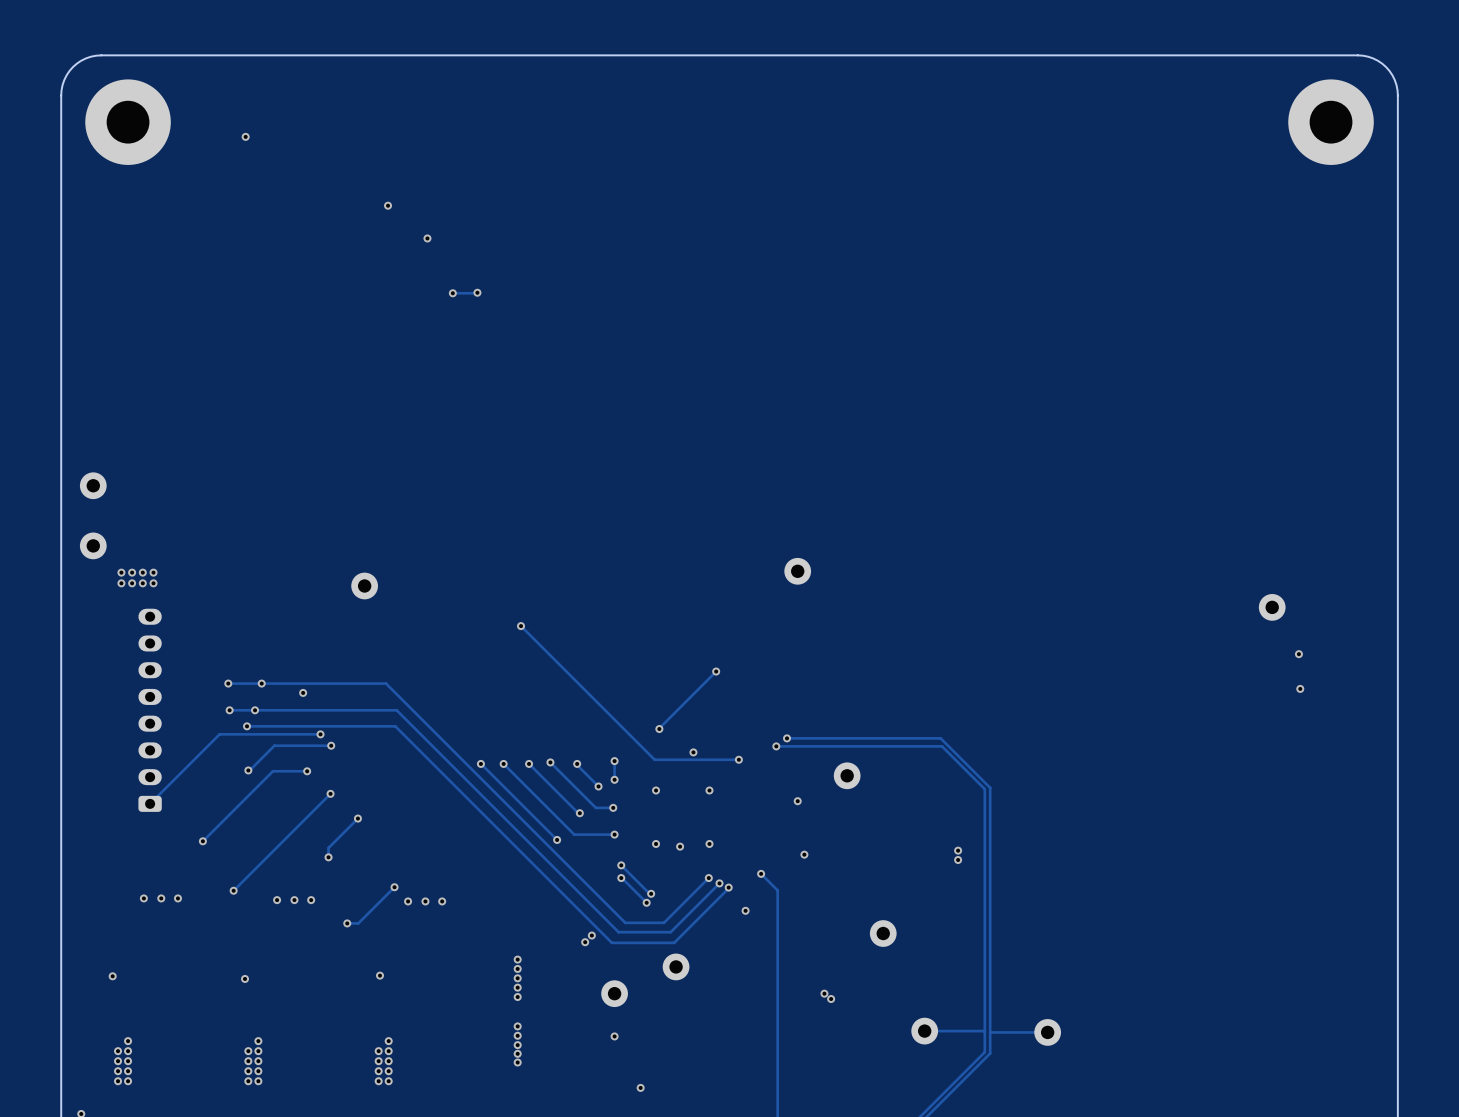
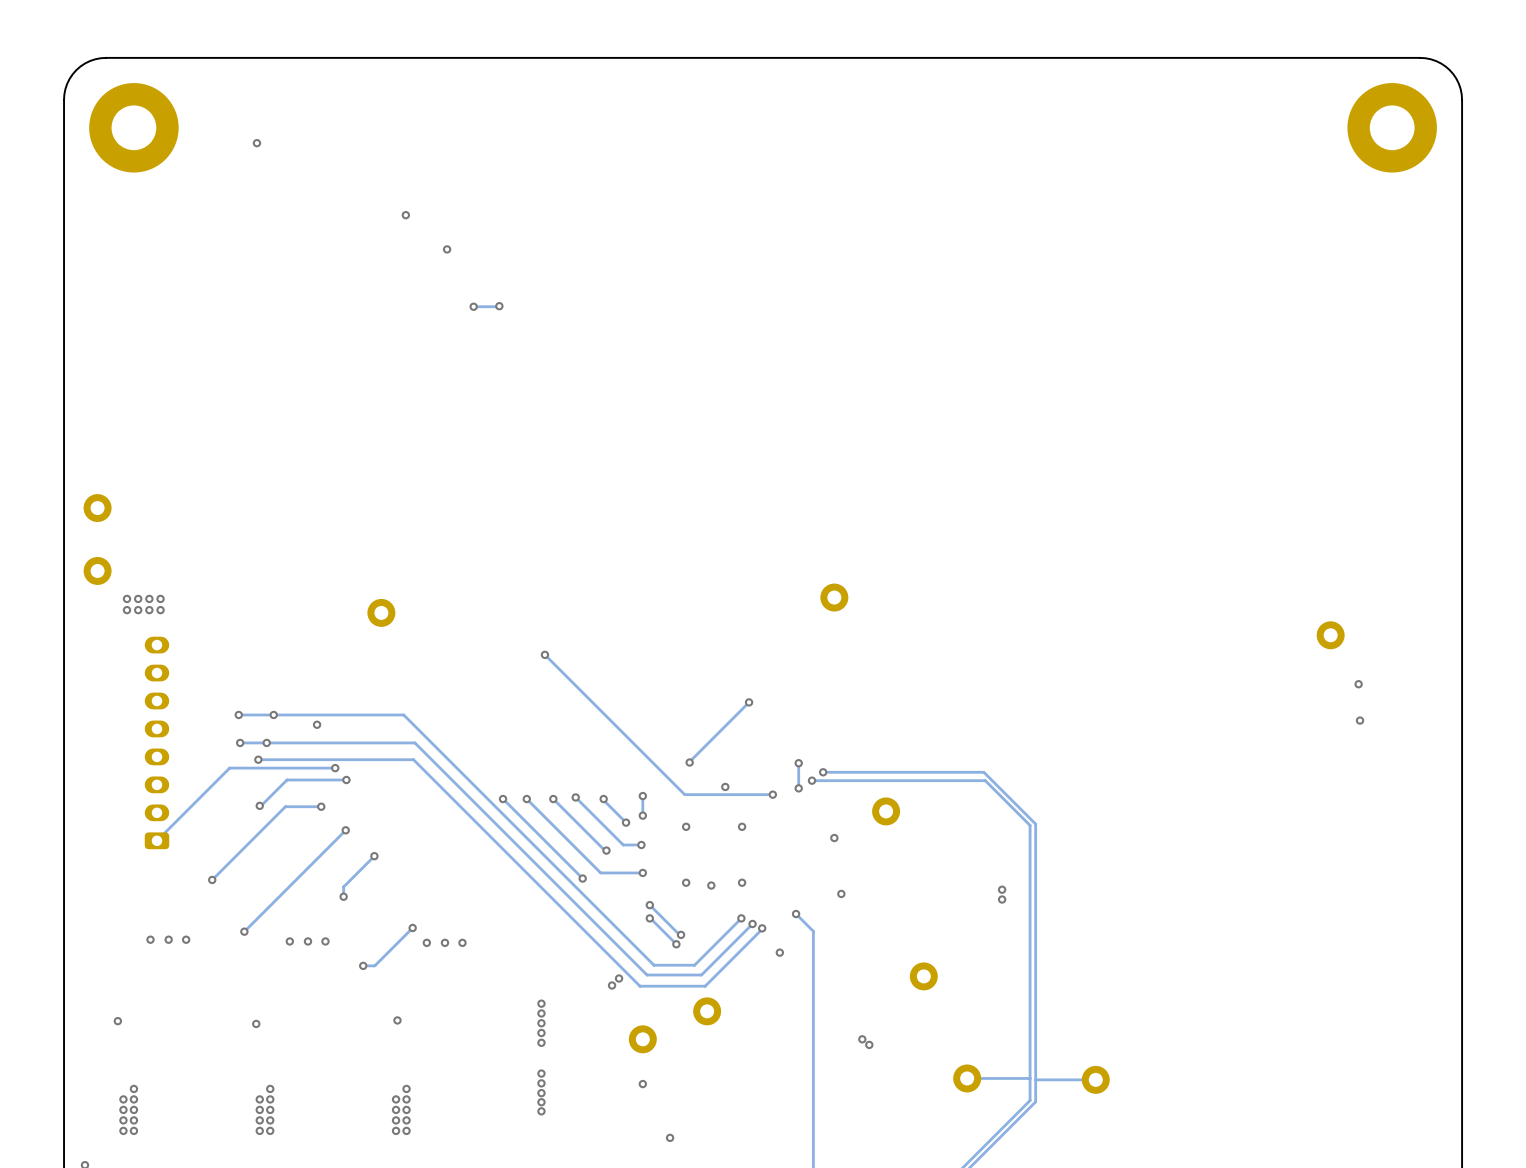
track: none -> (798, 763) (798, 788)
via: none -> (798, 763)
via: none -> (798, 788)

